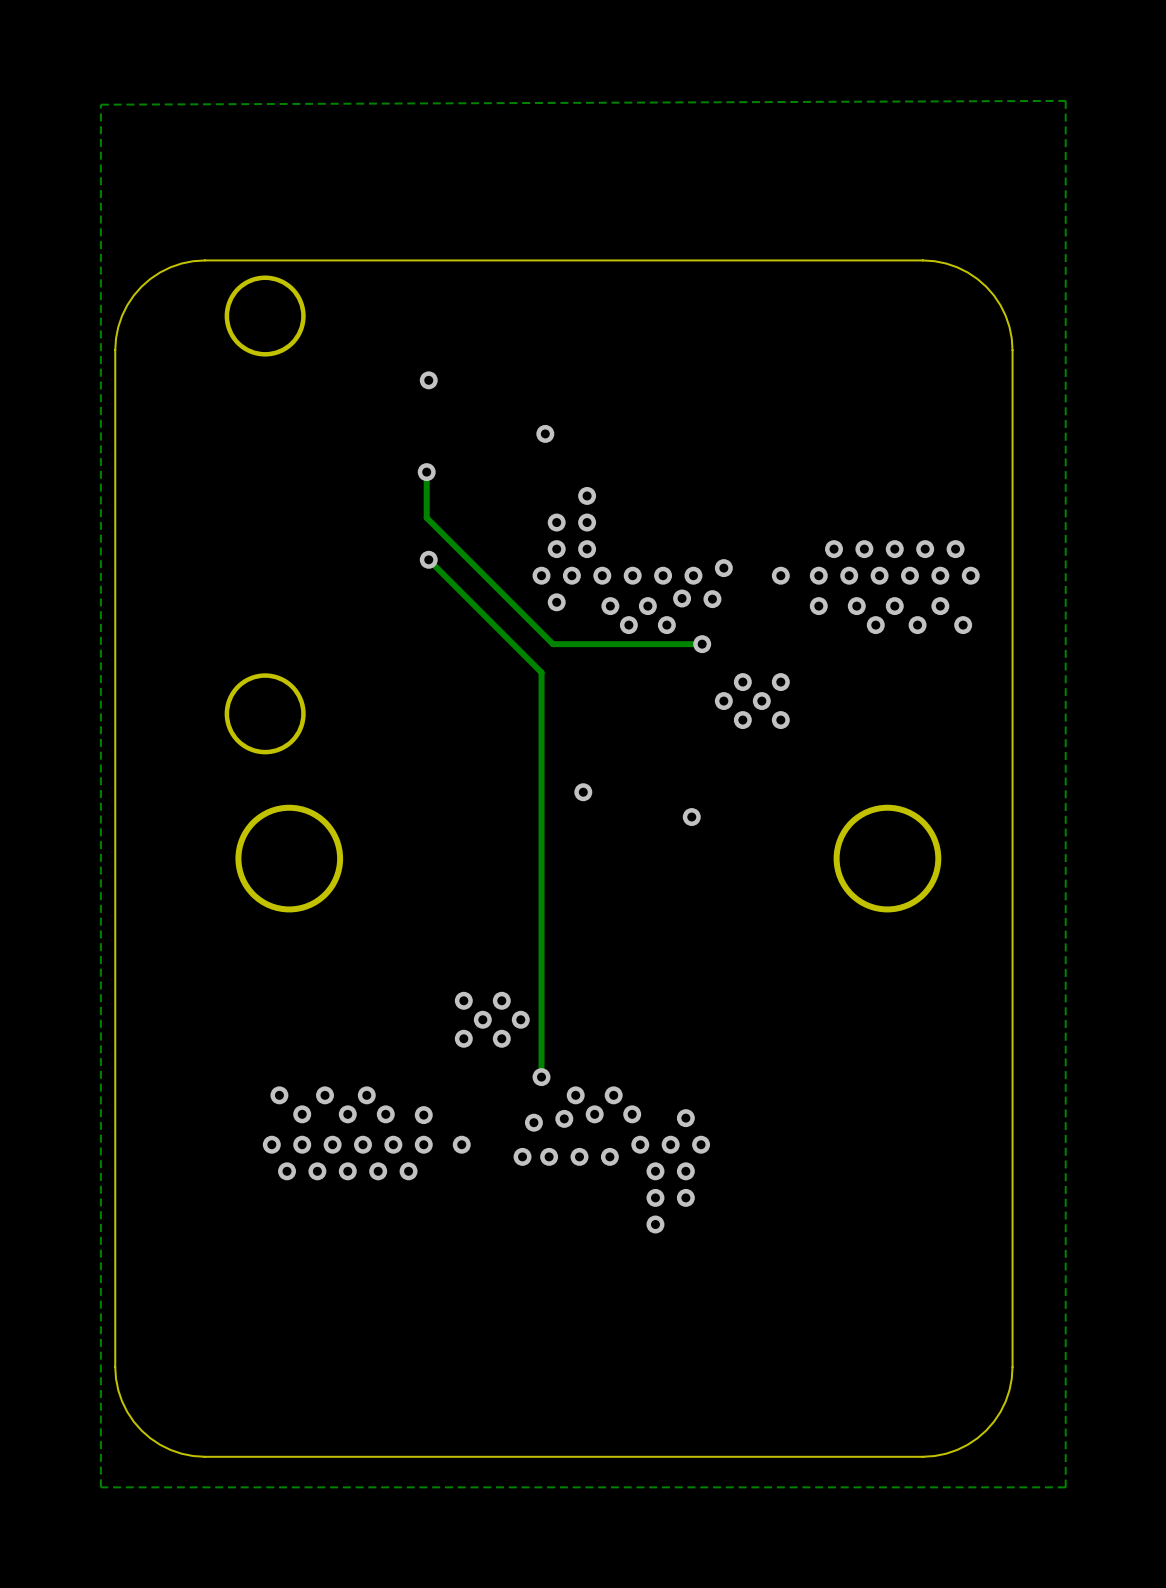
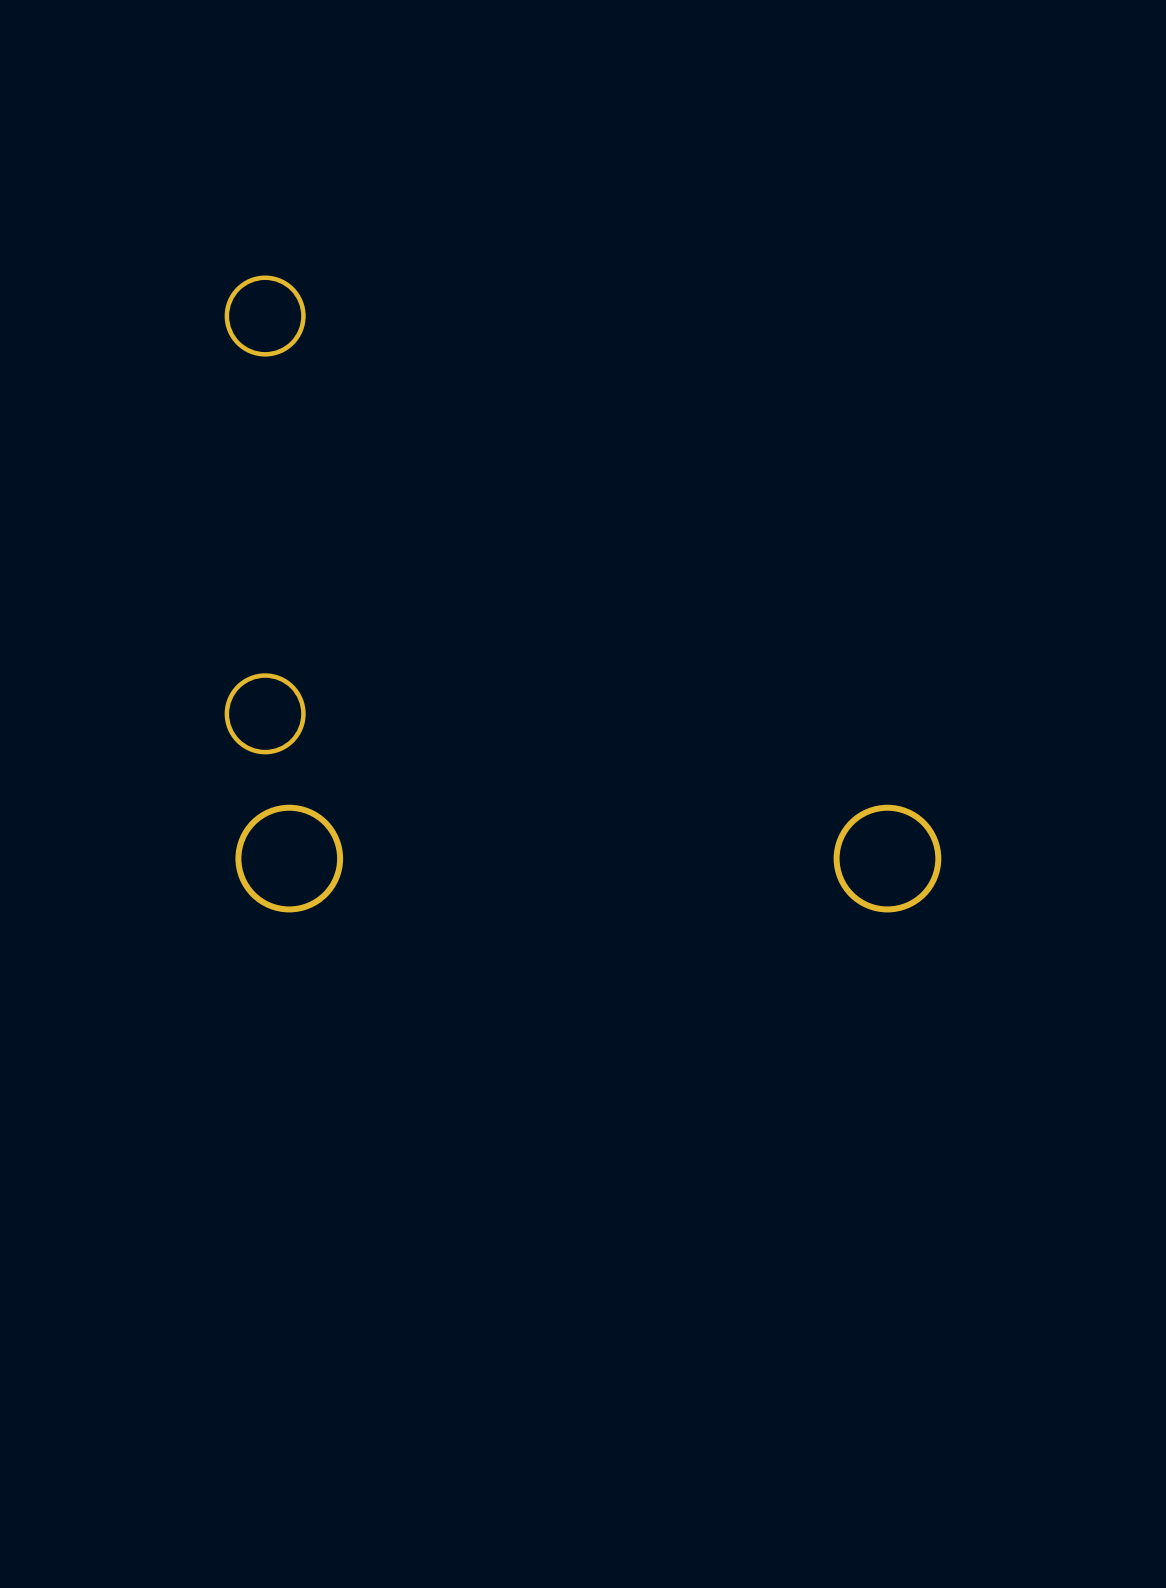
zone outline: (1065, 100) (1065, 1487) (100, 1487) (100, 104) (1065, 100) -> none
board edge: (922, 260) (204, 260) (181, 263) (160, 272) (141, 286) (127, 305) (118, 326) (115, 350) (115, 1367) (118, 1390) (127, 1411) (141, 1430) (160, 1444) (181, 1453) (204, 1456) (922, 1456) (946, 1453) (967, 1444) (986, 1430) (1000, 1411) (1009, 1390) (1012, 1367) (1011, 338) (1005, 315) (1000, 305) (993, 295) (977, 278) (957, 267) (946, 263) (922, 260) -> none
via: (428, 380) -> none
via: (545, 433) -> none
track: (426, 472) (426, 517) (552, 644) (702, 644) -> none
via: (426, 472) -> none
via: (587, 495) -> none
via: (556, 522) -> none
via: (587, 522) -> none
via: (556, 549) -> none
via: (587, 549) -> none
via: (834, 549) -> none
via: (864, 549) -> none
via: (894, 549) -> none
via: (925, 549) -> none
via: (955, 549) -> none
track: (428, 559) (541, 672) (541, 1077) -> none
via: (428, 559) -> none
via: (723, 568) -> none
via: (541, 575) -> none
via: (571, 575) -> none
via: (602, 575) -> none
via: (632, 575) -> none
via: (663, 575) -> none
via: (693, 575) -> none
via: (780, 575) -> none
via: (818, 575) -> none
via: (849, 575) -> none
via: (879, 575) -> none
via: (909, 575) -> none
via: (940, 575) -> none
via: (970, 575) -> none
via: (682, 598) -> none
via: (712, 599) -> none
via: (556, 602) -> none
via: (610, 606) -> none
via: (647, 606) -> none
via: (818, 606) -> none
via: (856, 606) -> none
via: (894, 606) -> none
via: (940, 606) -> none
via: (628, 625) -> none
via: (666, 625) -> none
via: (875, 625) -> none
via: (917, 625) -> none
via: (963, 625) -> none
via: (702, 644) -> none
via: (742, 682) -> none
via: (780, 682) -> none
via: (723, 701) -> none
via: (761, 701) -> none
via: (742, 720) -> none
via: (780, 720) -> none
via: (583, 792) -> none
via: (691, 817) -> none
via: (463, 1000) -> none
via: (501, 1000) -> none
via: (482, 1019) -> none
via: (520, 1019) -> none
via: (463, 1038) -> none
via: (501, 1038) -> none
via: (541, 1077) -> none
via: (279, 1095) -> none
via: (325, 1095) -> none
via: (366, 1095) -> none
via: (575, 1095) -> none
via: (613, 1095) -> none
via: (302, 1114) -> none
via: (347, 1114) -> none
via: (385, 1114) -> none
via: (594, 1114) -> none
via: (632, 1114) -> none
via: (423, 1115) -> none
via: (564, 1118) -> none
via: (685, 1118) -> none
via: (533, 1122) -> none
via: (271, 1144) -> none
via: (302, 1144) -> none
via: (332, 1144) -> none
via: (362, 1144) -> none
via: (393, 1144) -> none
via: (423, 1144) -> none
via: (461, 1144) -> none
via: (640, 1144) -> none
via: (670, 1144) -> none
via: (701, 1144) -> none
via: (522, 1156) -> none
via: (549, 1156) -> none
via: (579, 1156) -> none
via: (609, 1156) -> none
via: (287, 1171) -> none
via: (317, 1171) -> none
via: (347, 1171) -> none
via: (378, 1171) -> none
via: (408, 1171) -> none
via: (655, 1171) -> none
via: (685, 1171) -> none
via: (655, 1197) -> none
via: (685, 1197) -> none
via: (655, 1224) -> none

